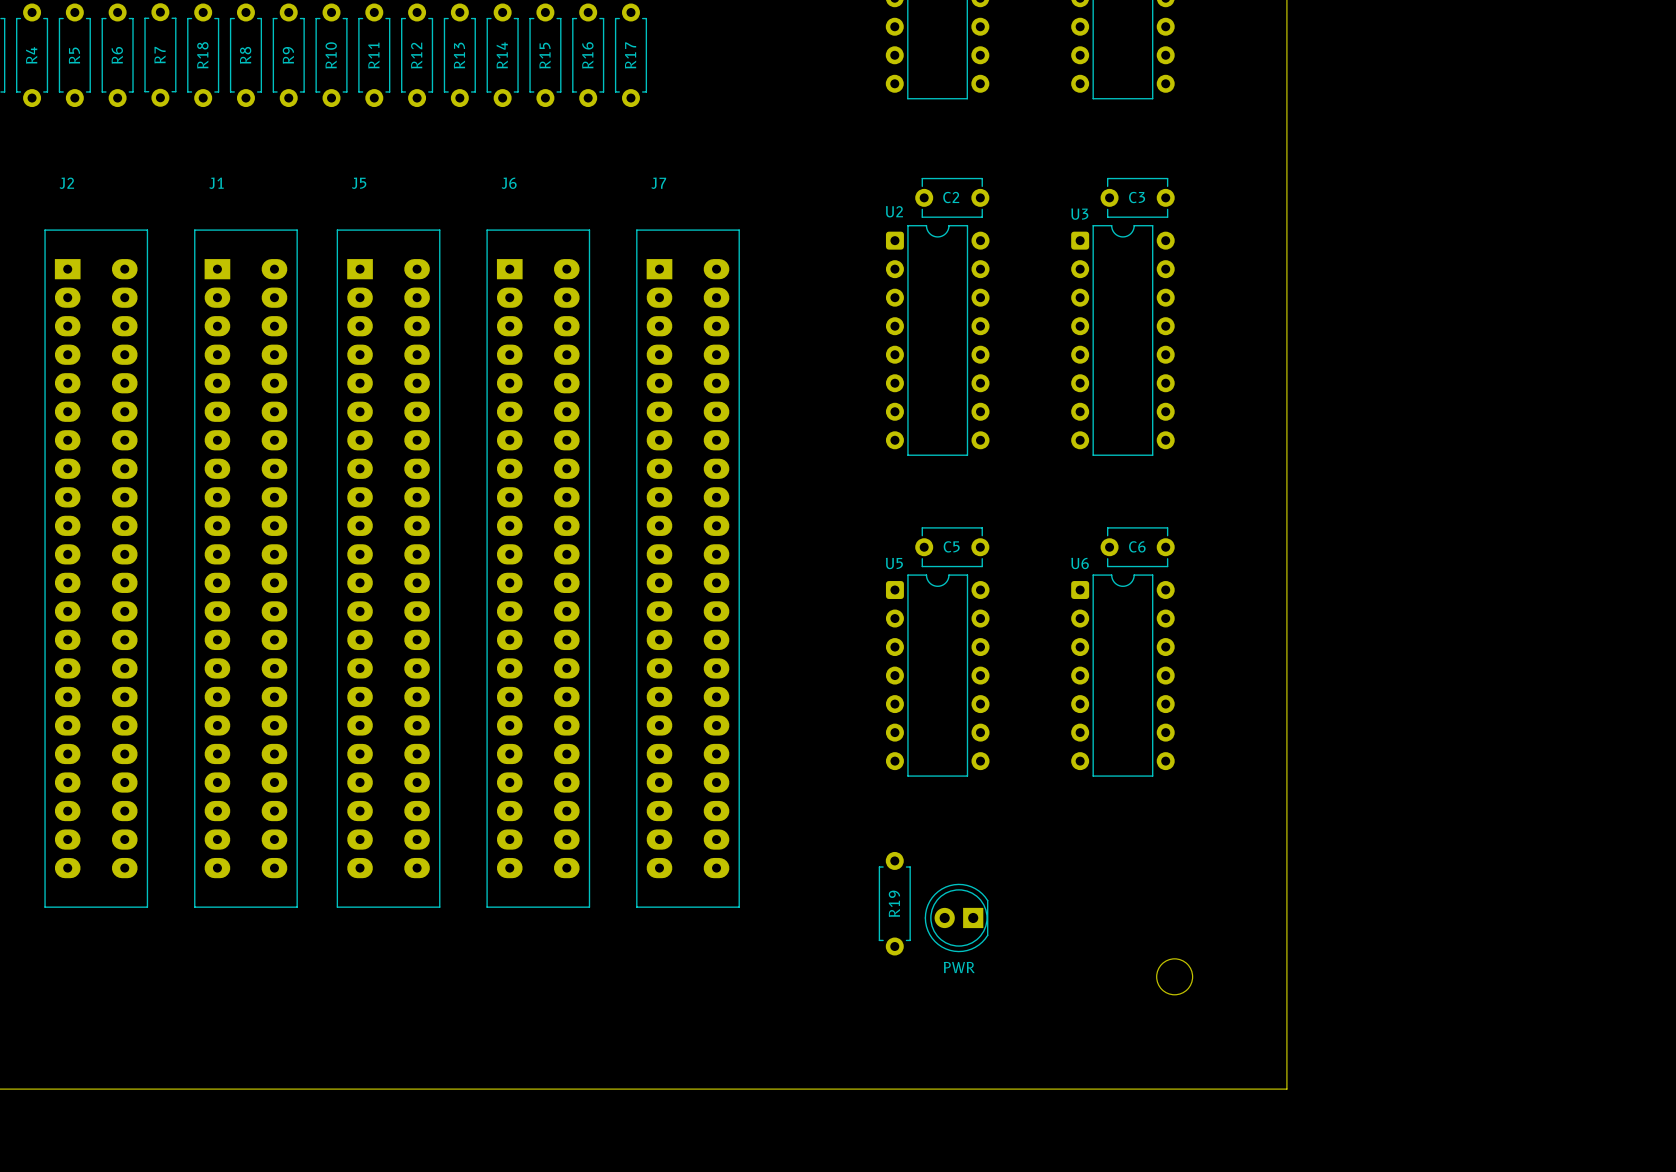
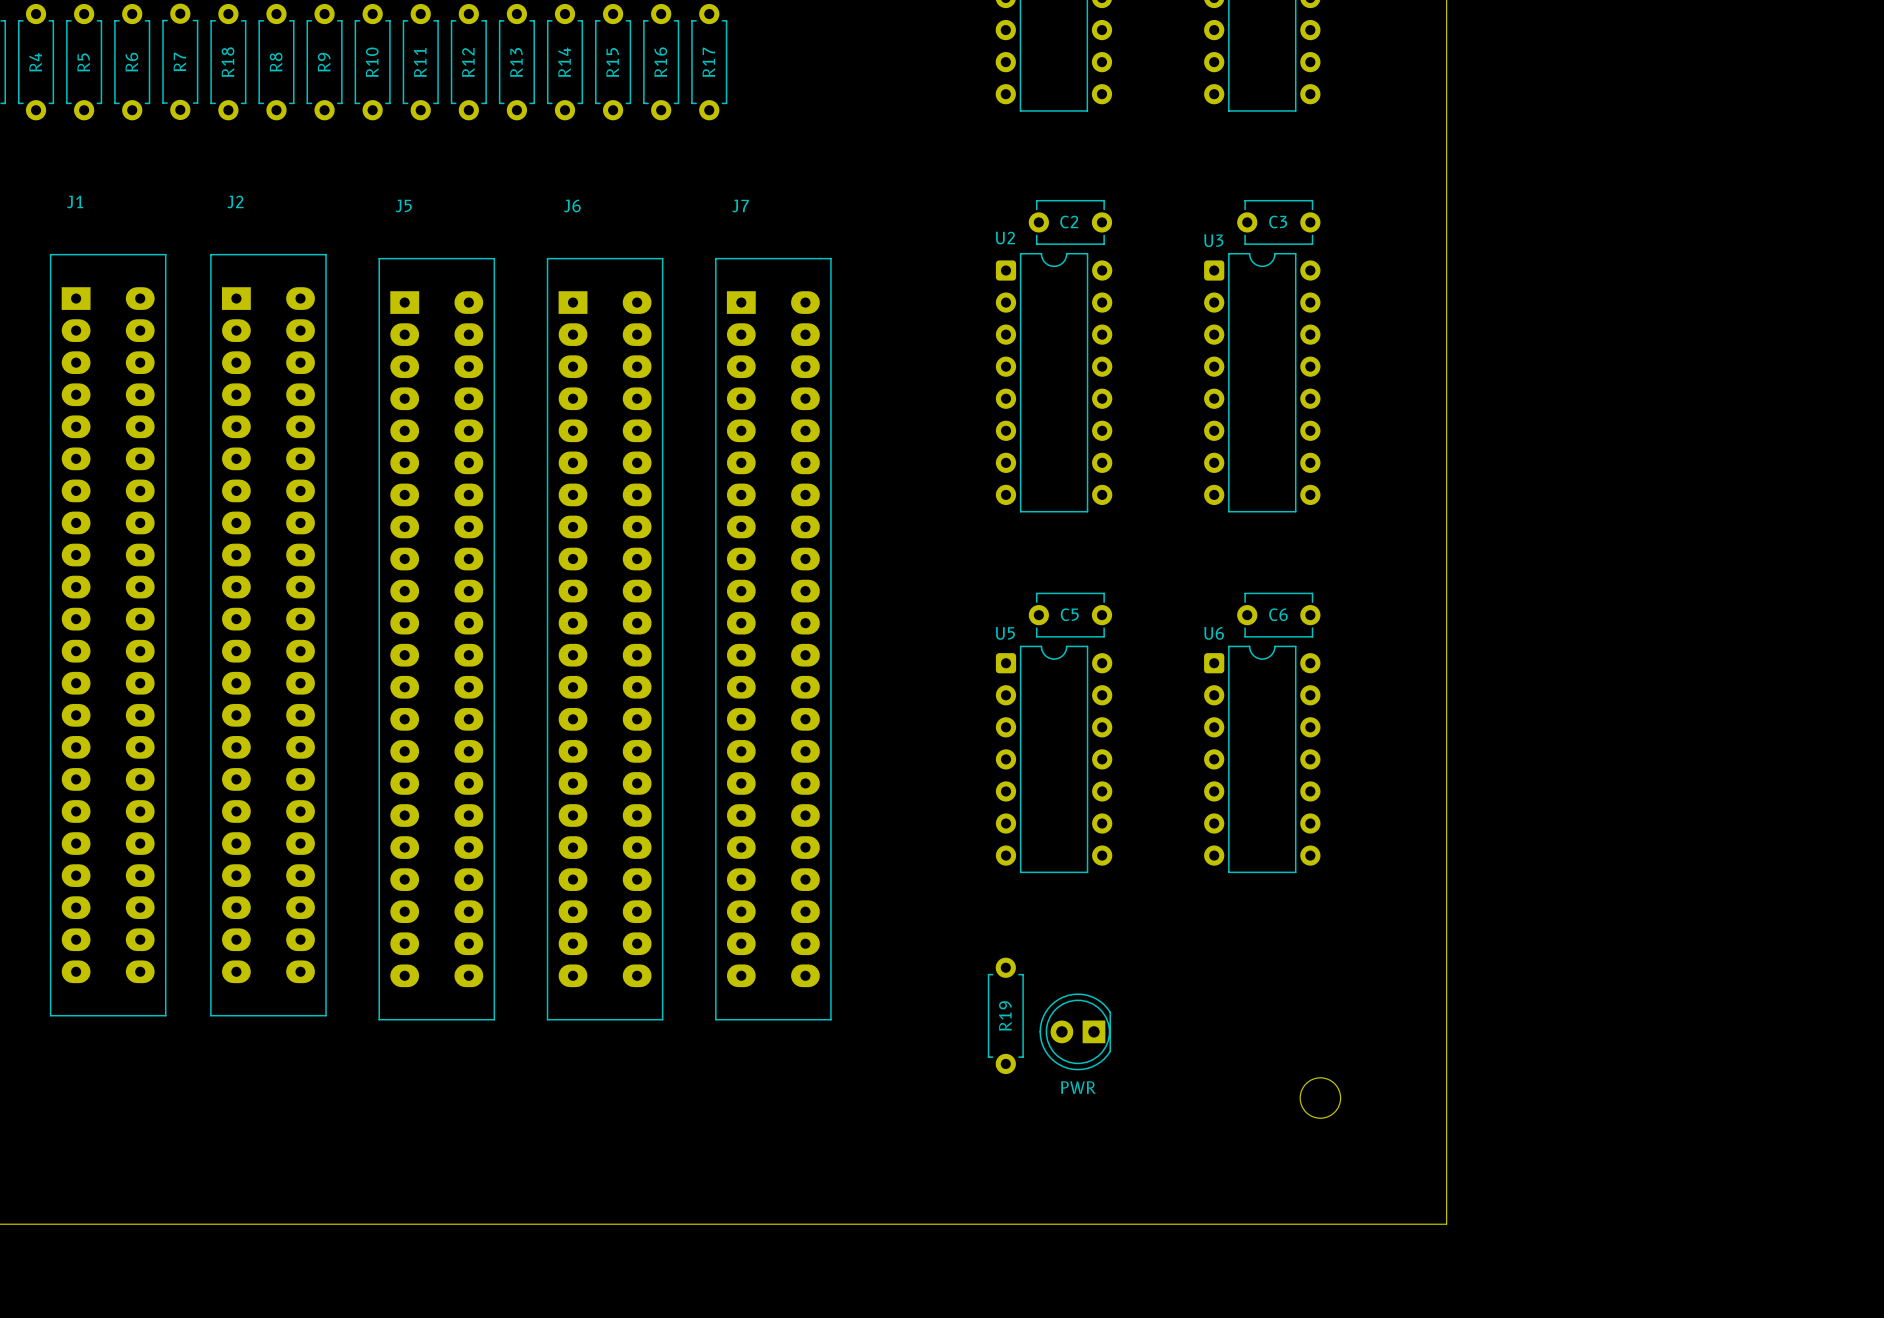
J2 position: (96, 568) -> (268, 635)
J1 position: (245, 568) -> (108, 635)

